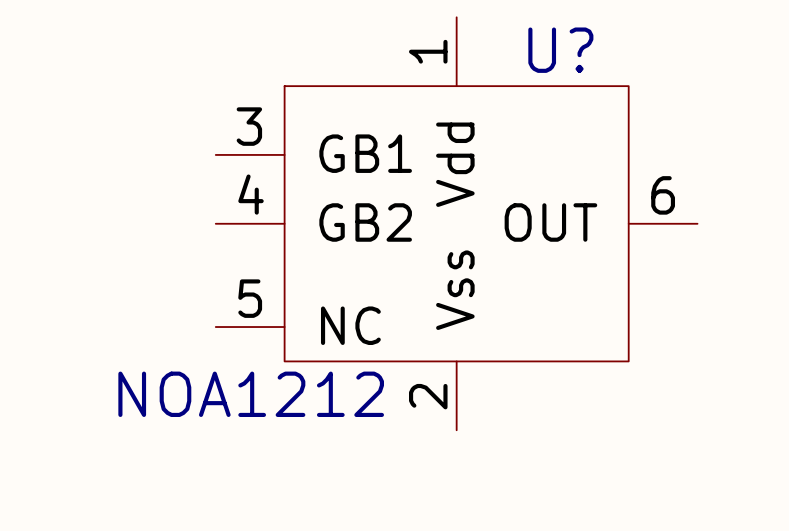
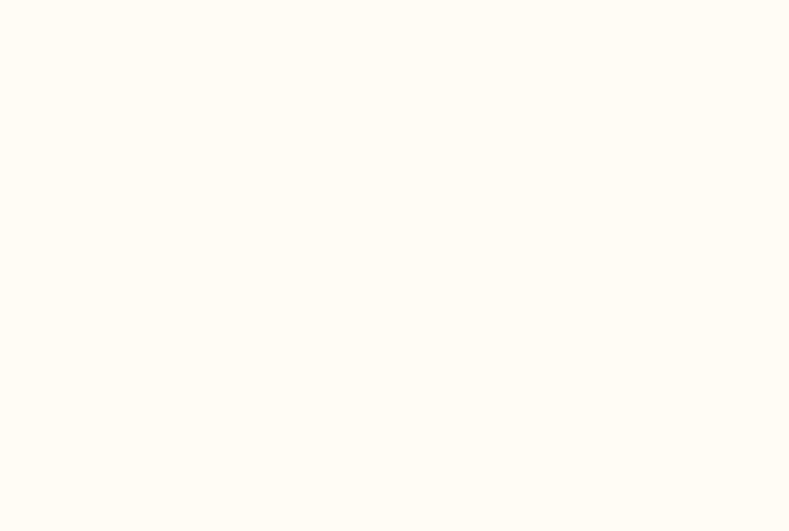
U?: NOA1212 (456, 223) -> none

